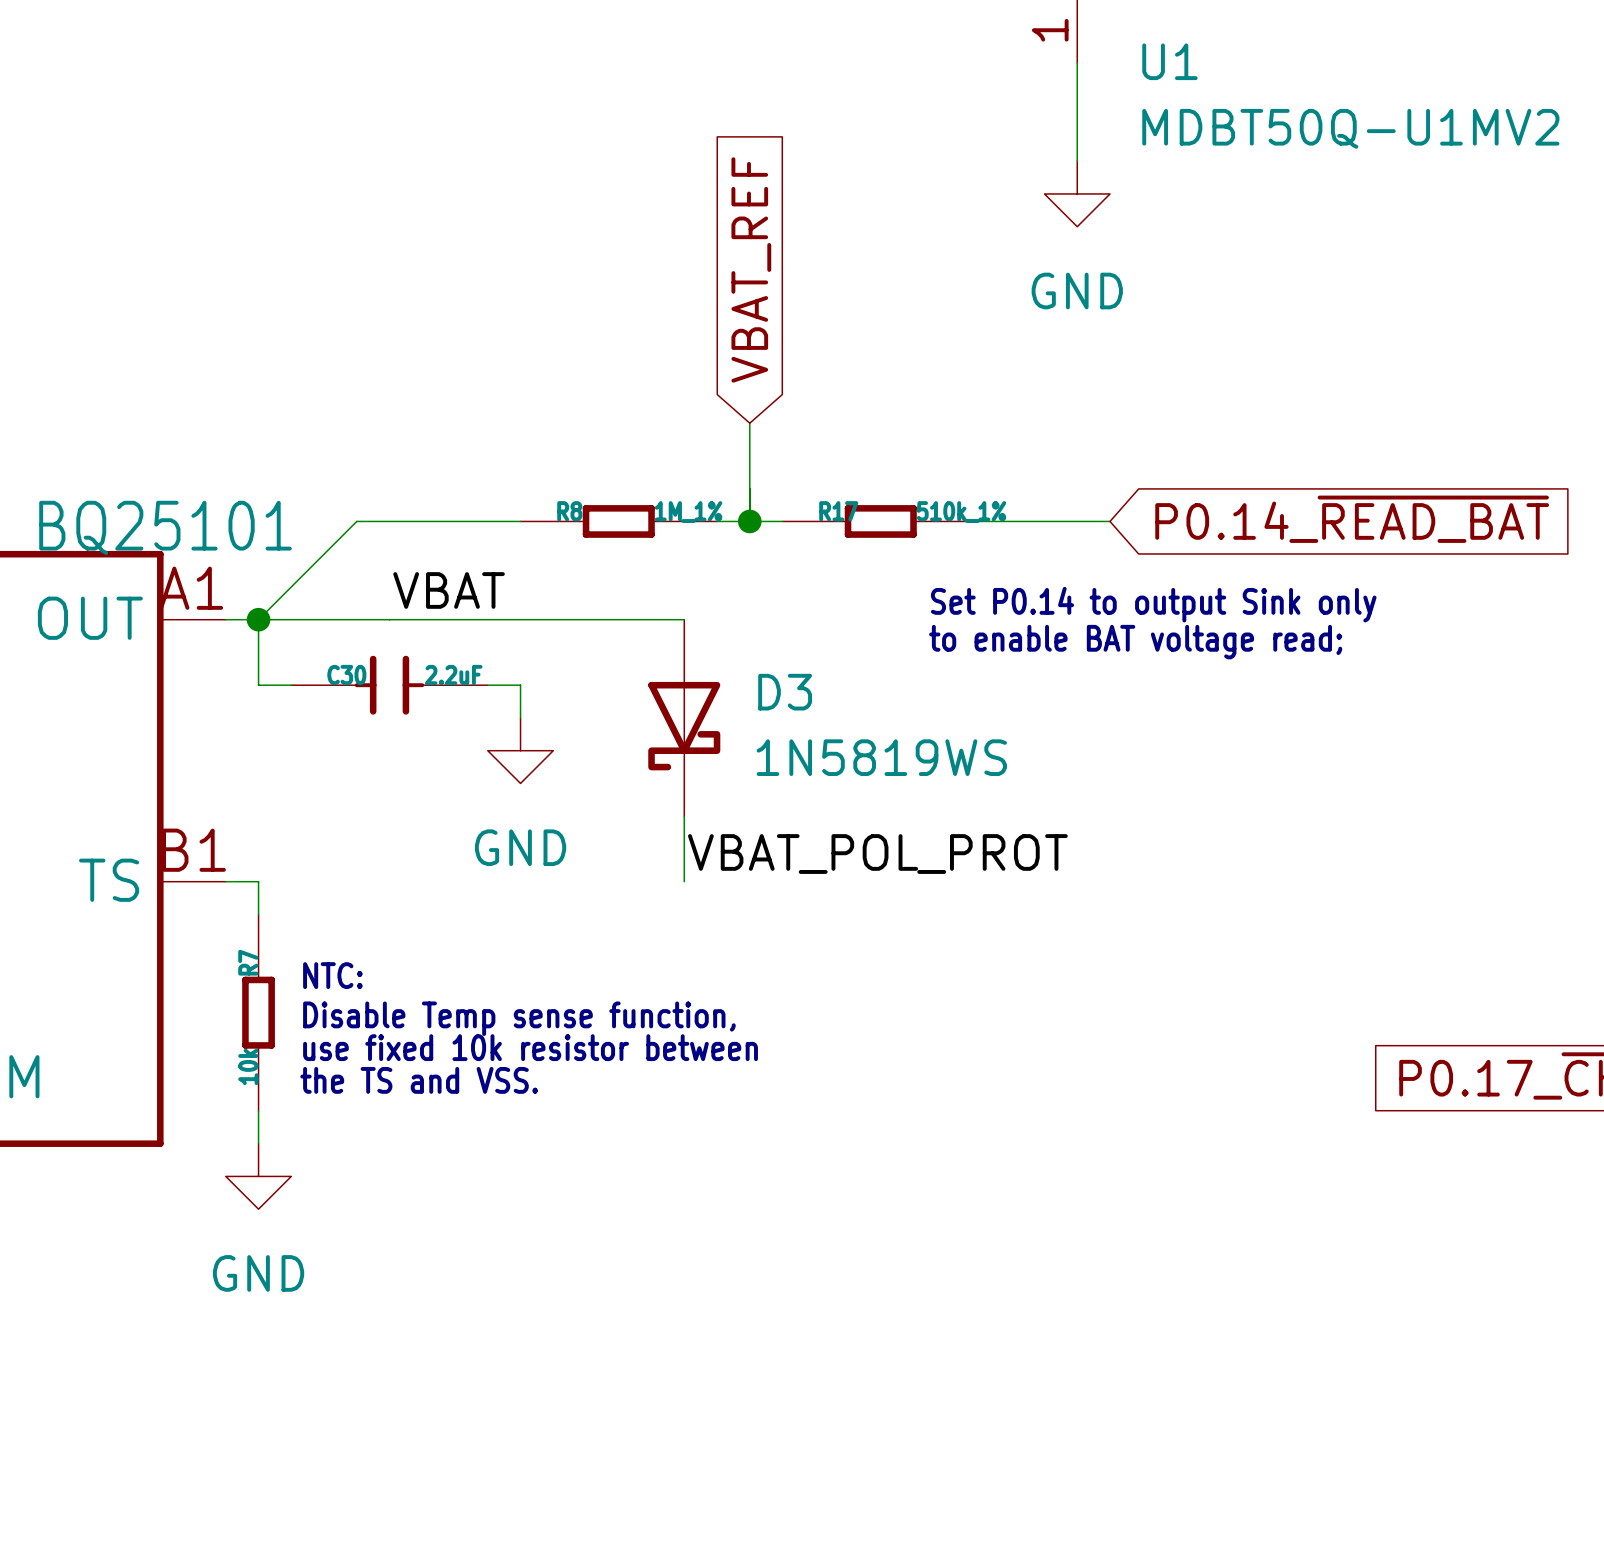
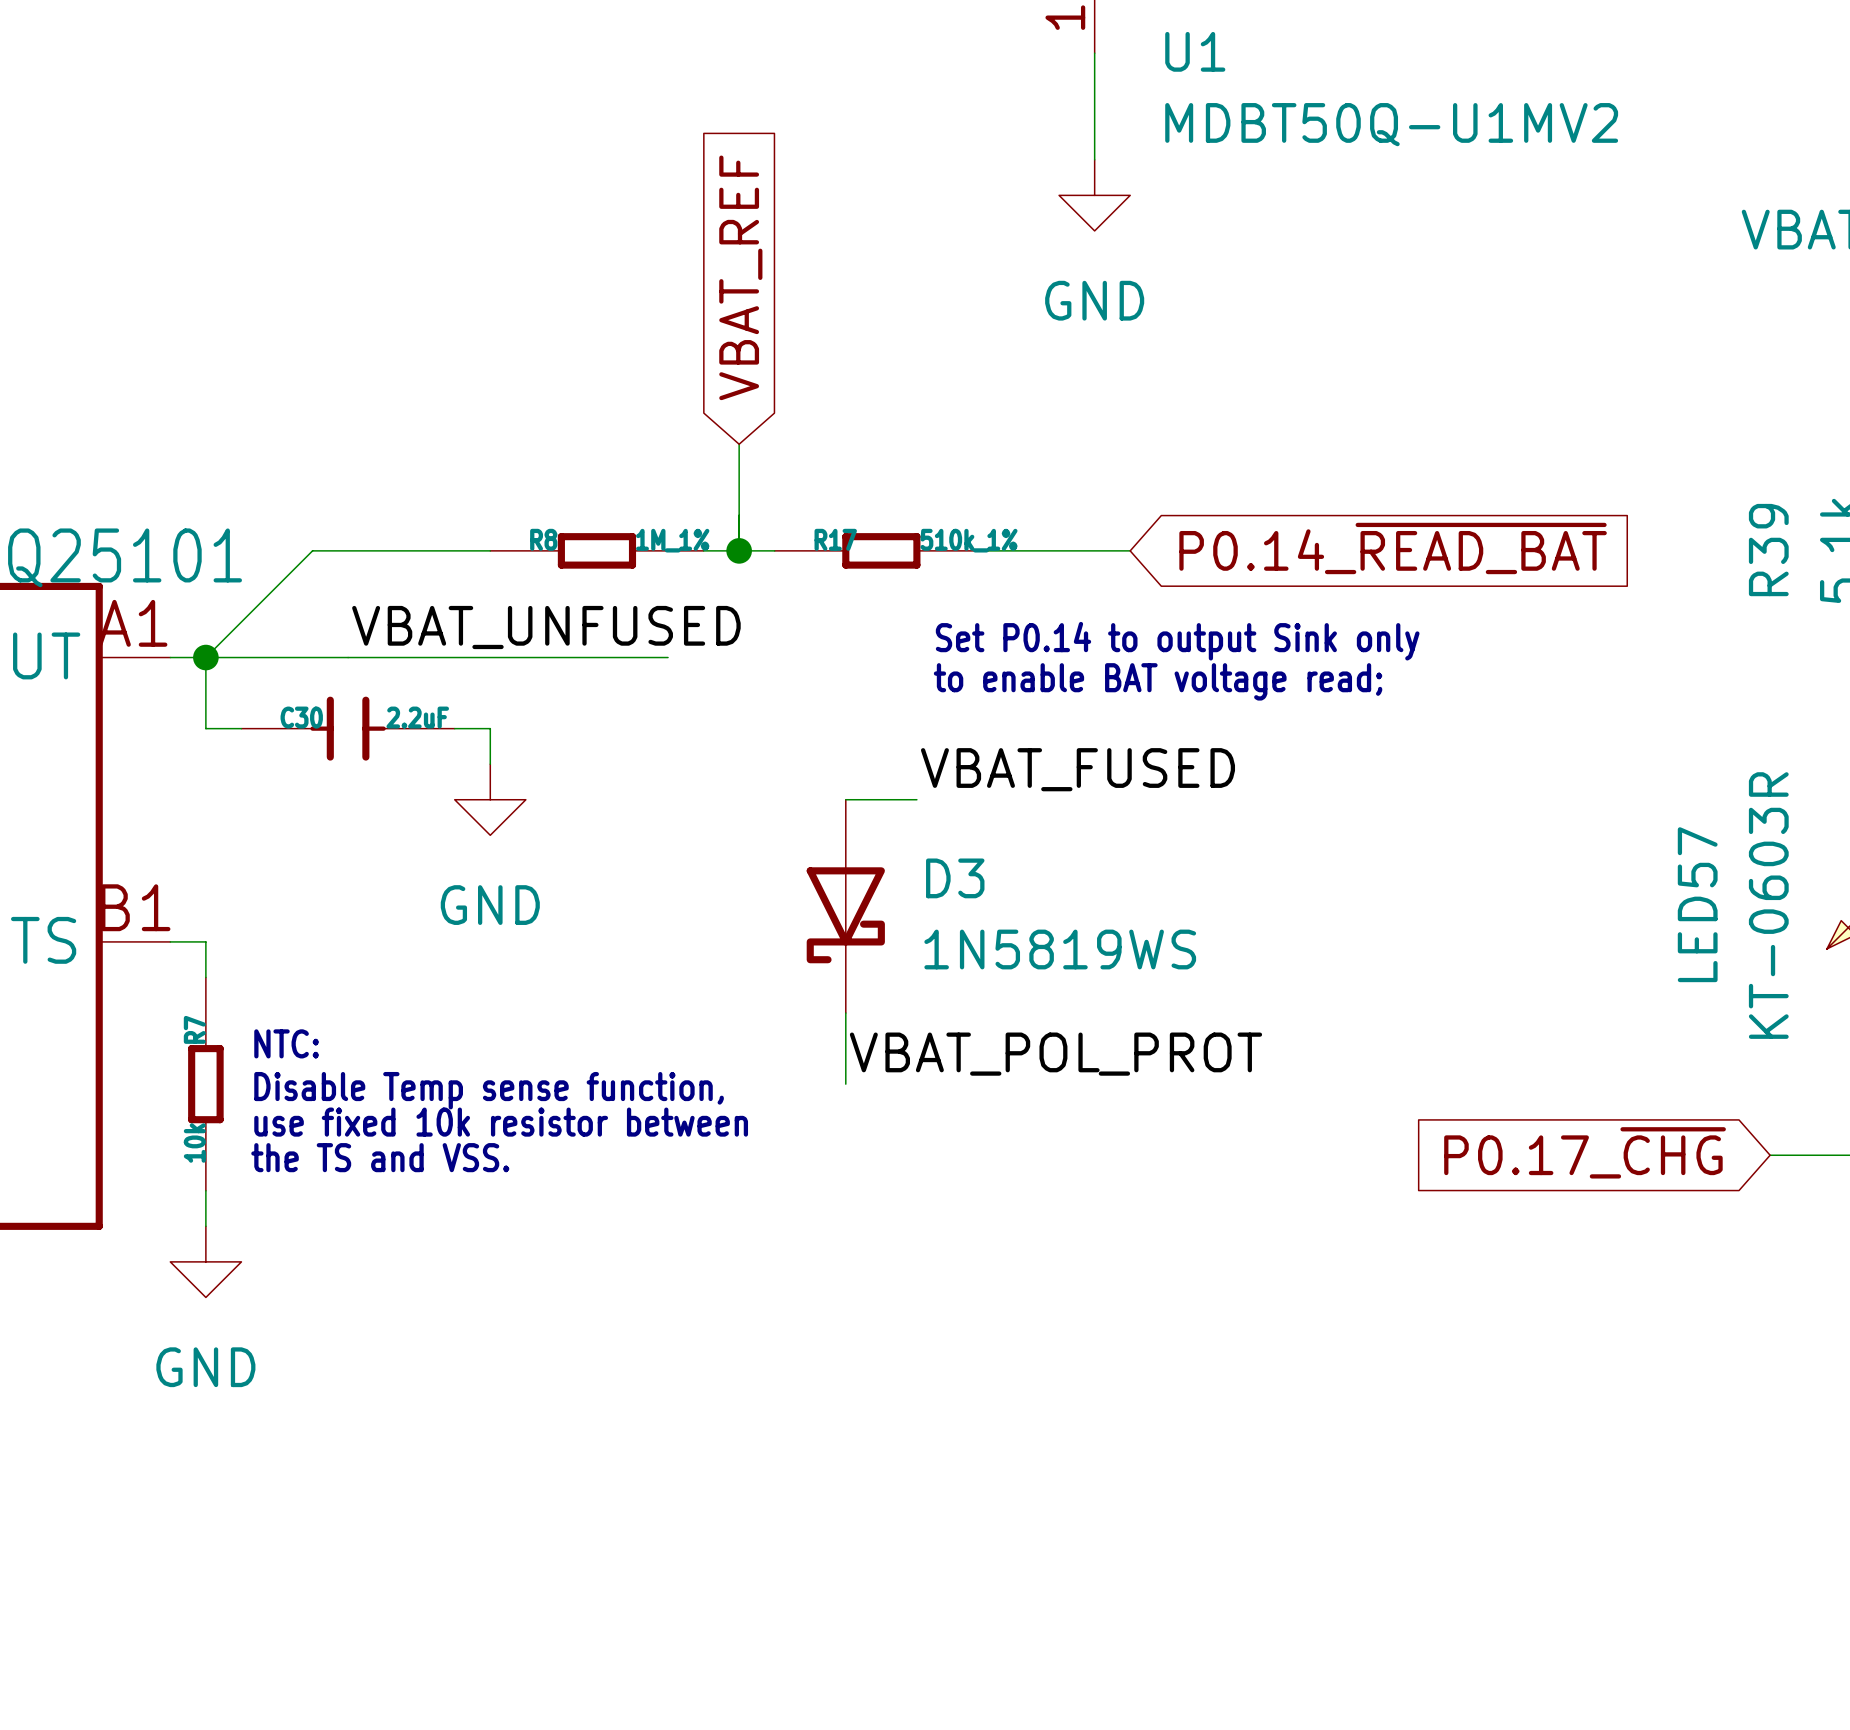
label: VBAT (449, 590) -> VBAT_UNFUSED (546, 627)
D3 position: (684, 717) -> (845, 906)
label: none -> VBAT_FUSED (1077, 769)
wire: none -> (845, 799) (916, 799)
wire: (684, 816) (684, 881) -> (845, 1013) (845, 1084)
label position: VBAT_POL_PROT (877, 854) -> VBAT_POL_PROT (1055, 1054)

